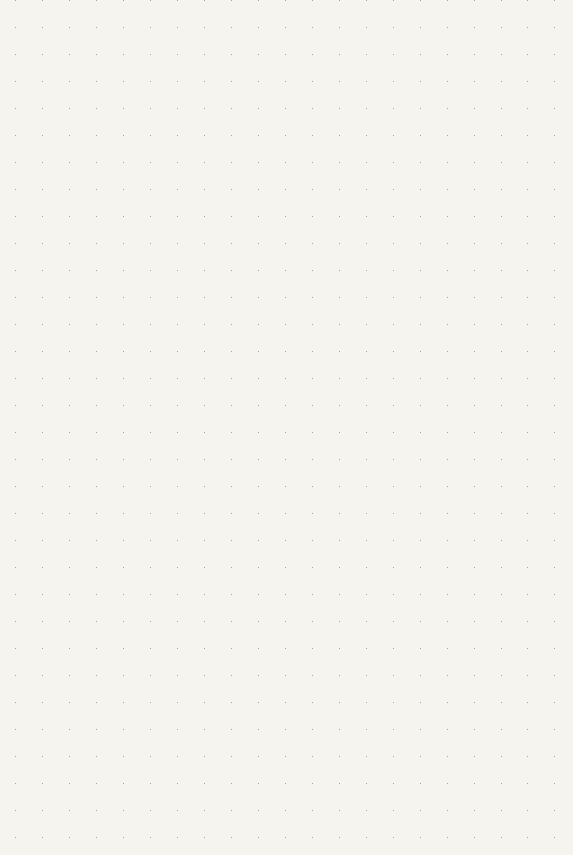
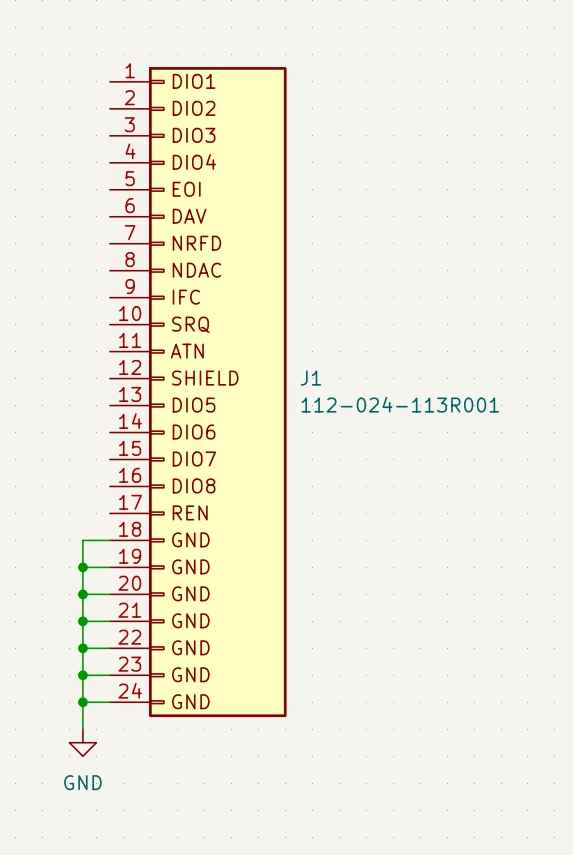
J1: none -> 112-024-113R001 (198, 392)
wire: none -> (109, 540) (82, 540) (82, 729)
wire: none -> (82, 567) (109, 567)
junction: none -> (82, 567)
wire: none -> (82, 594) (109, 594)
junction: none -> (82, 594)
wire: none -> (82, 621) (109, 621)
junction: none -> (82, 621)
wire: none -> (82, 648) (109, 648)
junction: none -> (82, 648)
wire: none -> (82, 675) (109, 675)
junction: none -> (82, 675)
wire: none -> (82, 702) (109, 702)
junction: none -> (82, 702)
power symbol: none -> GND (82, 742)

